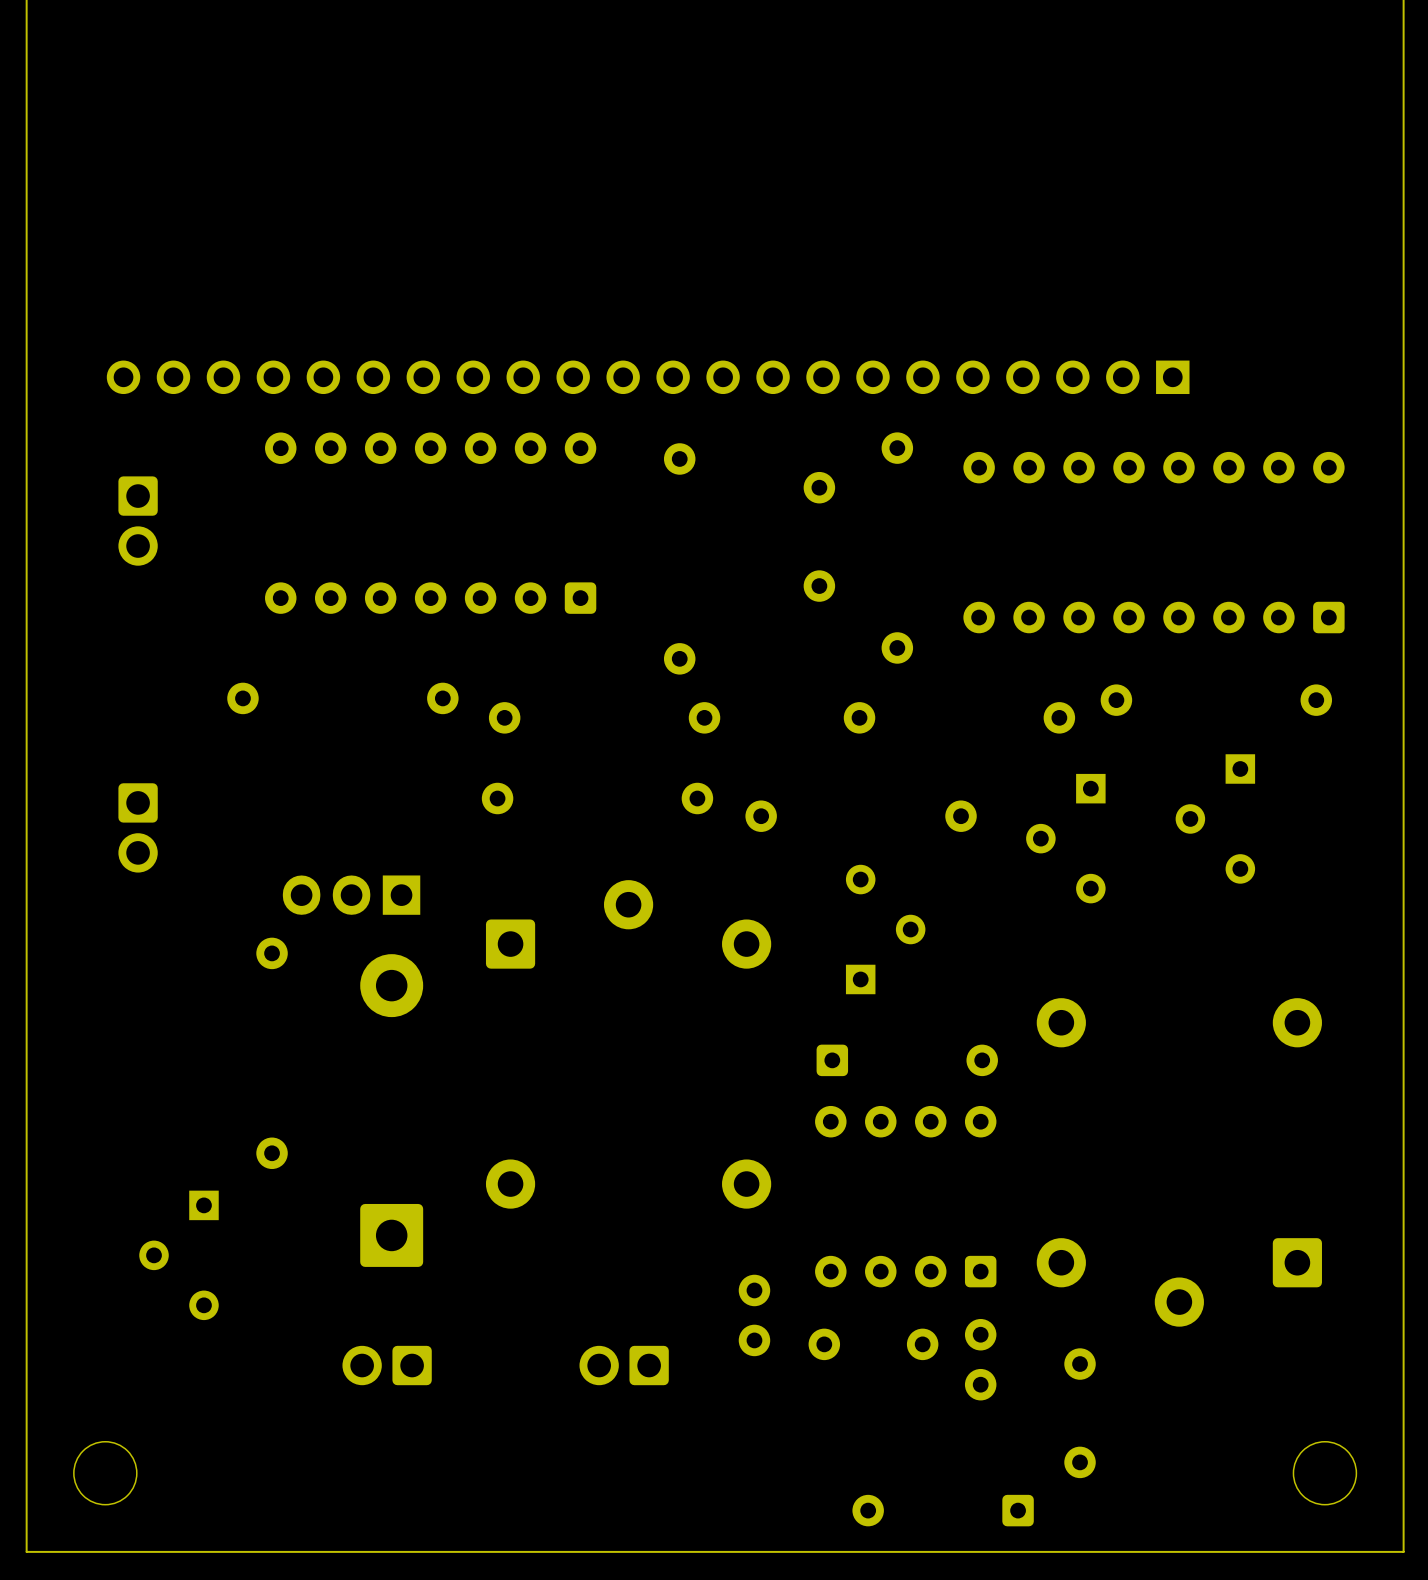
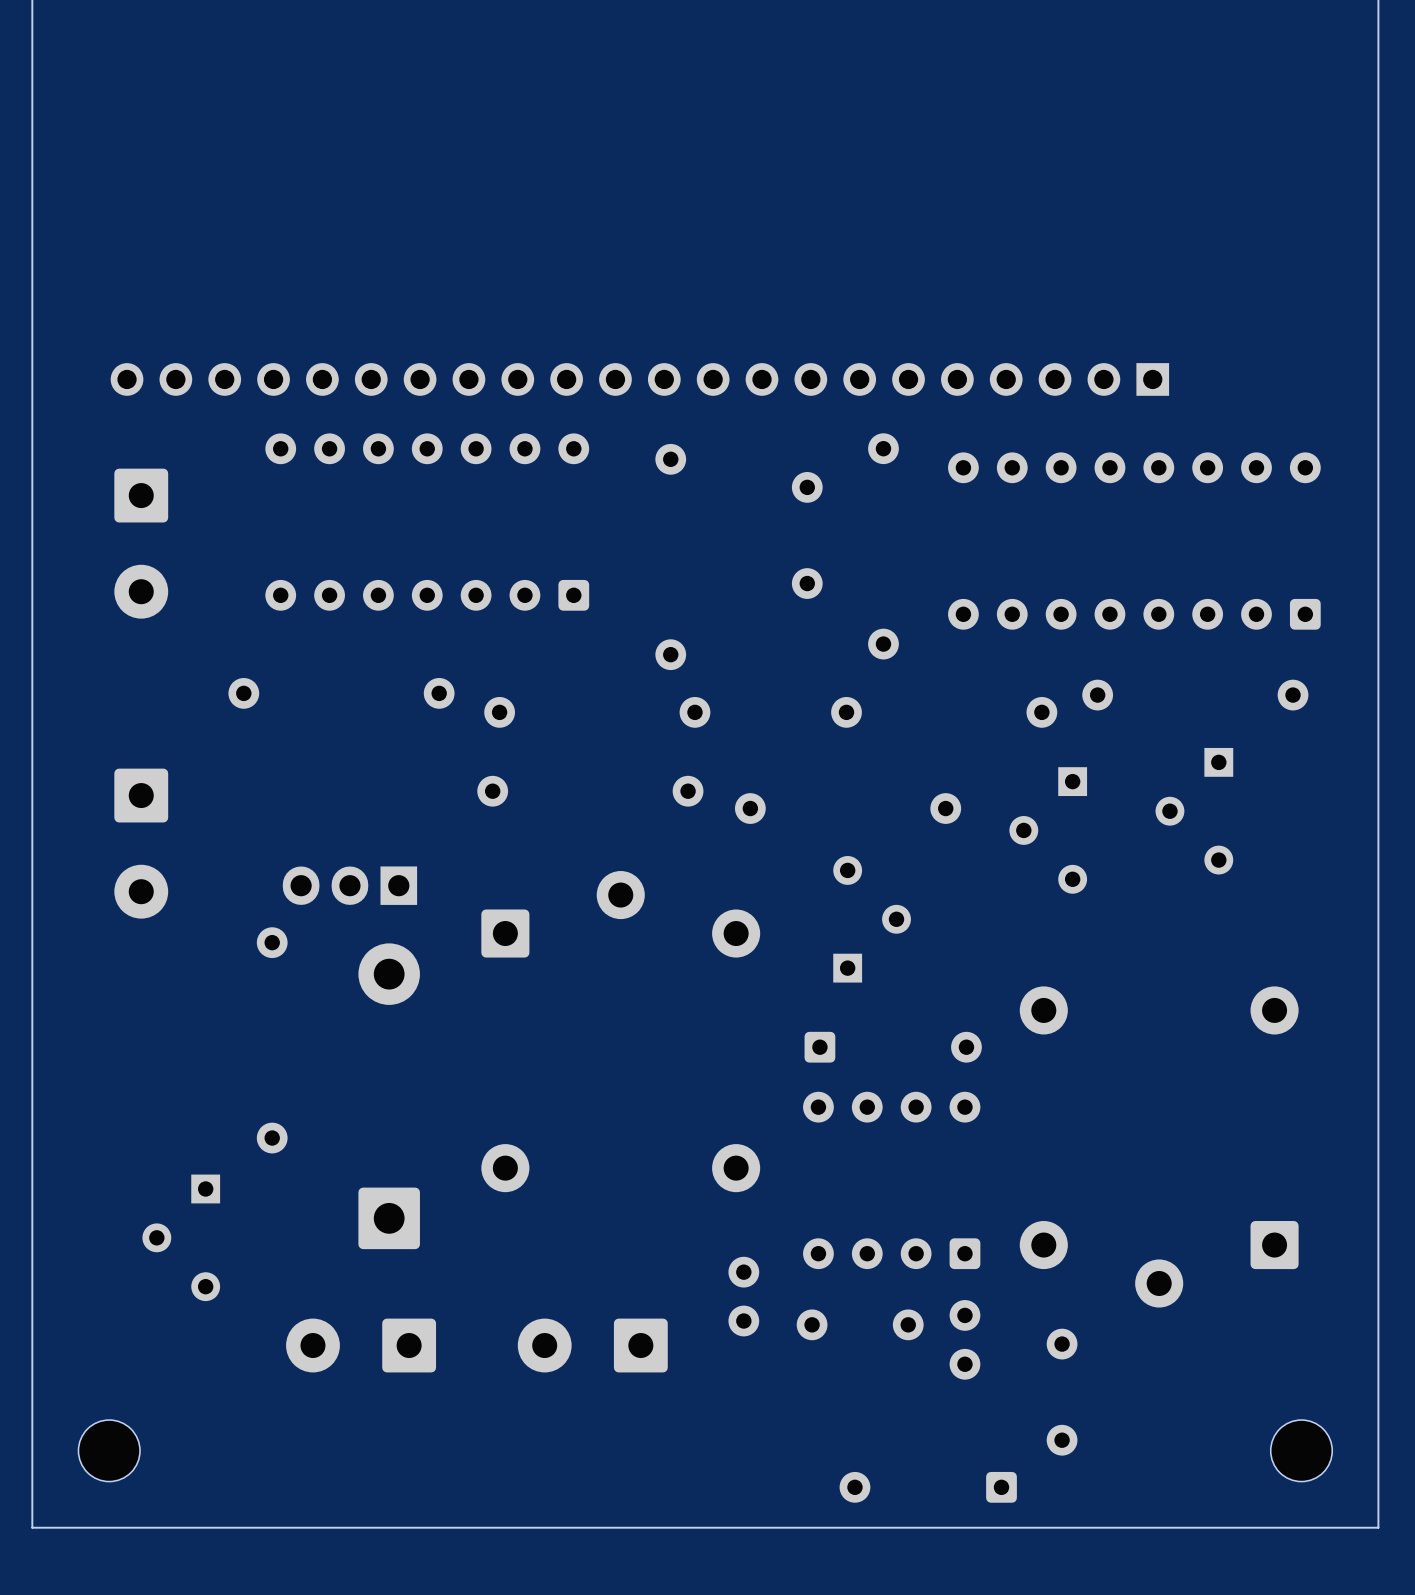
part: (138, 521) -> none
part: none -> (141, 543)
part: (138, 827) -> none
part: none -> (141, 843)
part: none -> (361, 1345)
part: (387, 1365) -> none
part: none -> (592, 1345)
part: (624, 1365) -> none

